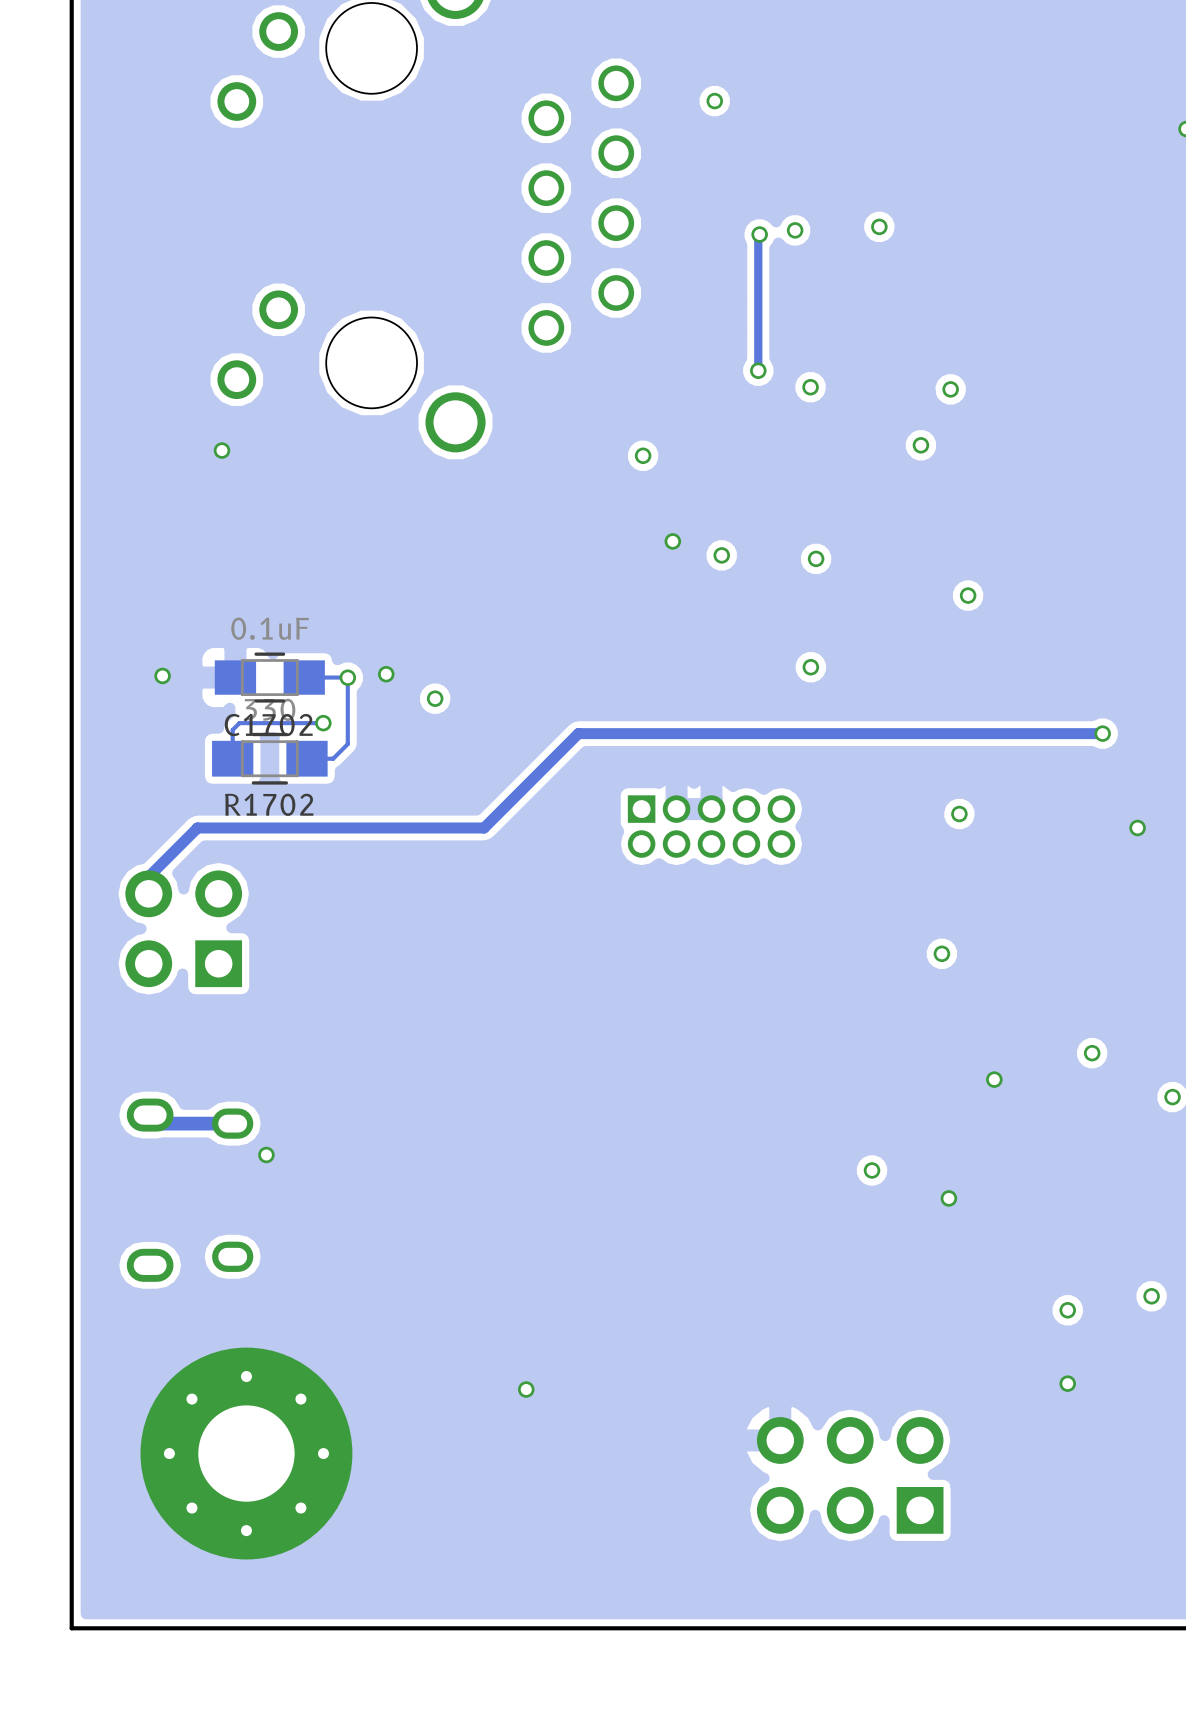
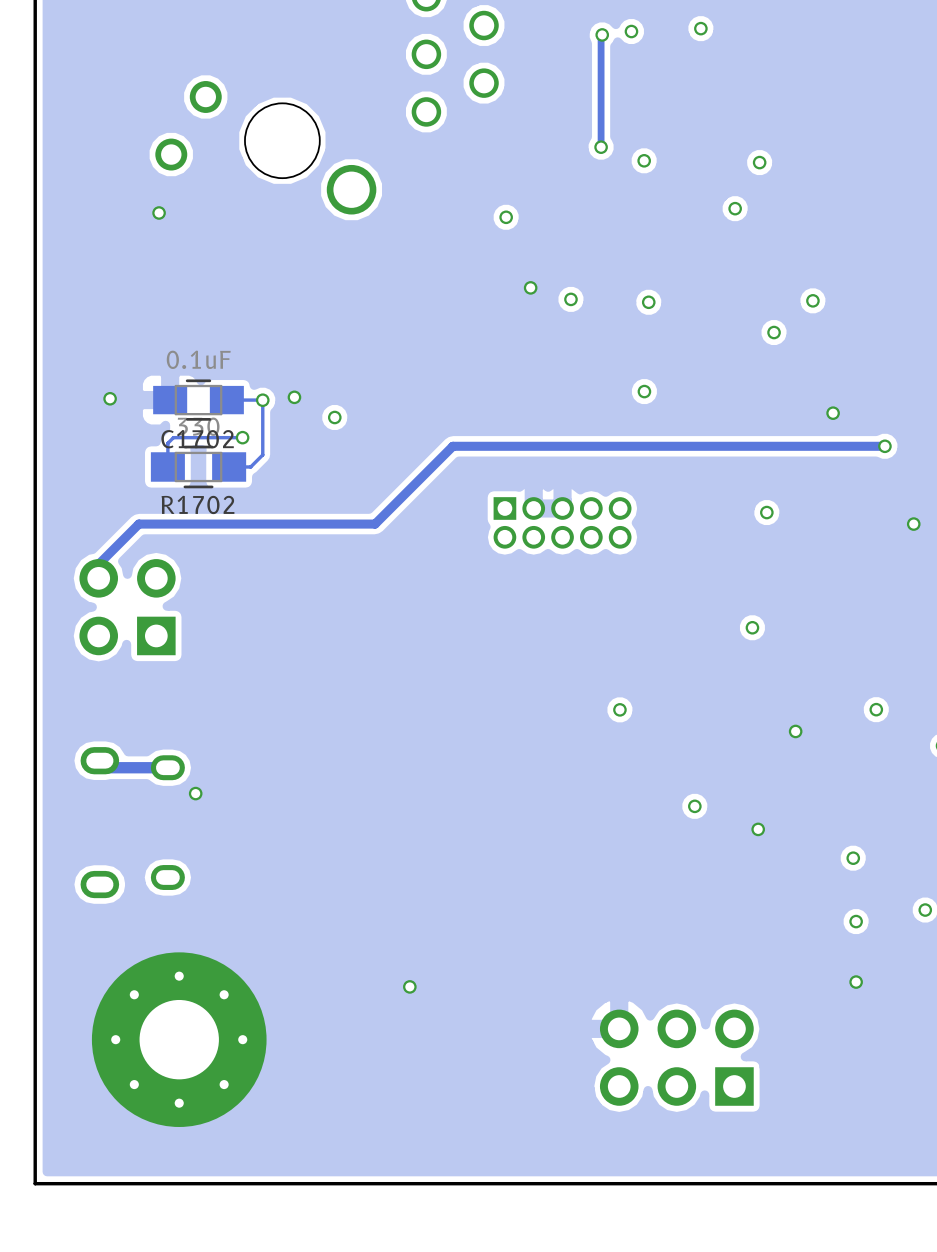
via: none -> (812, 300)
via: none -> (833, 413)
via: none -> (619, 709)
via: none -> (853, 858)

